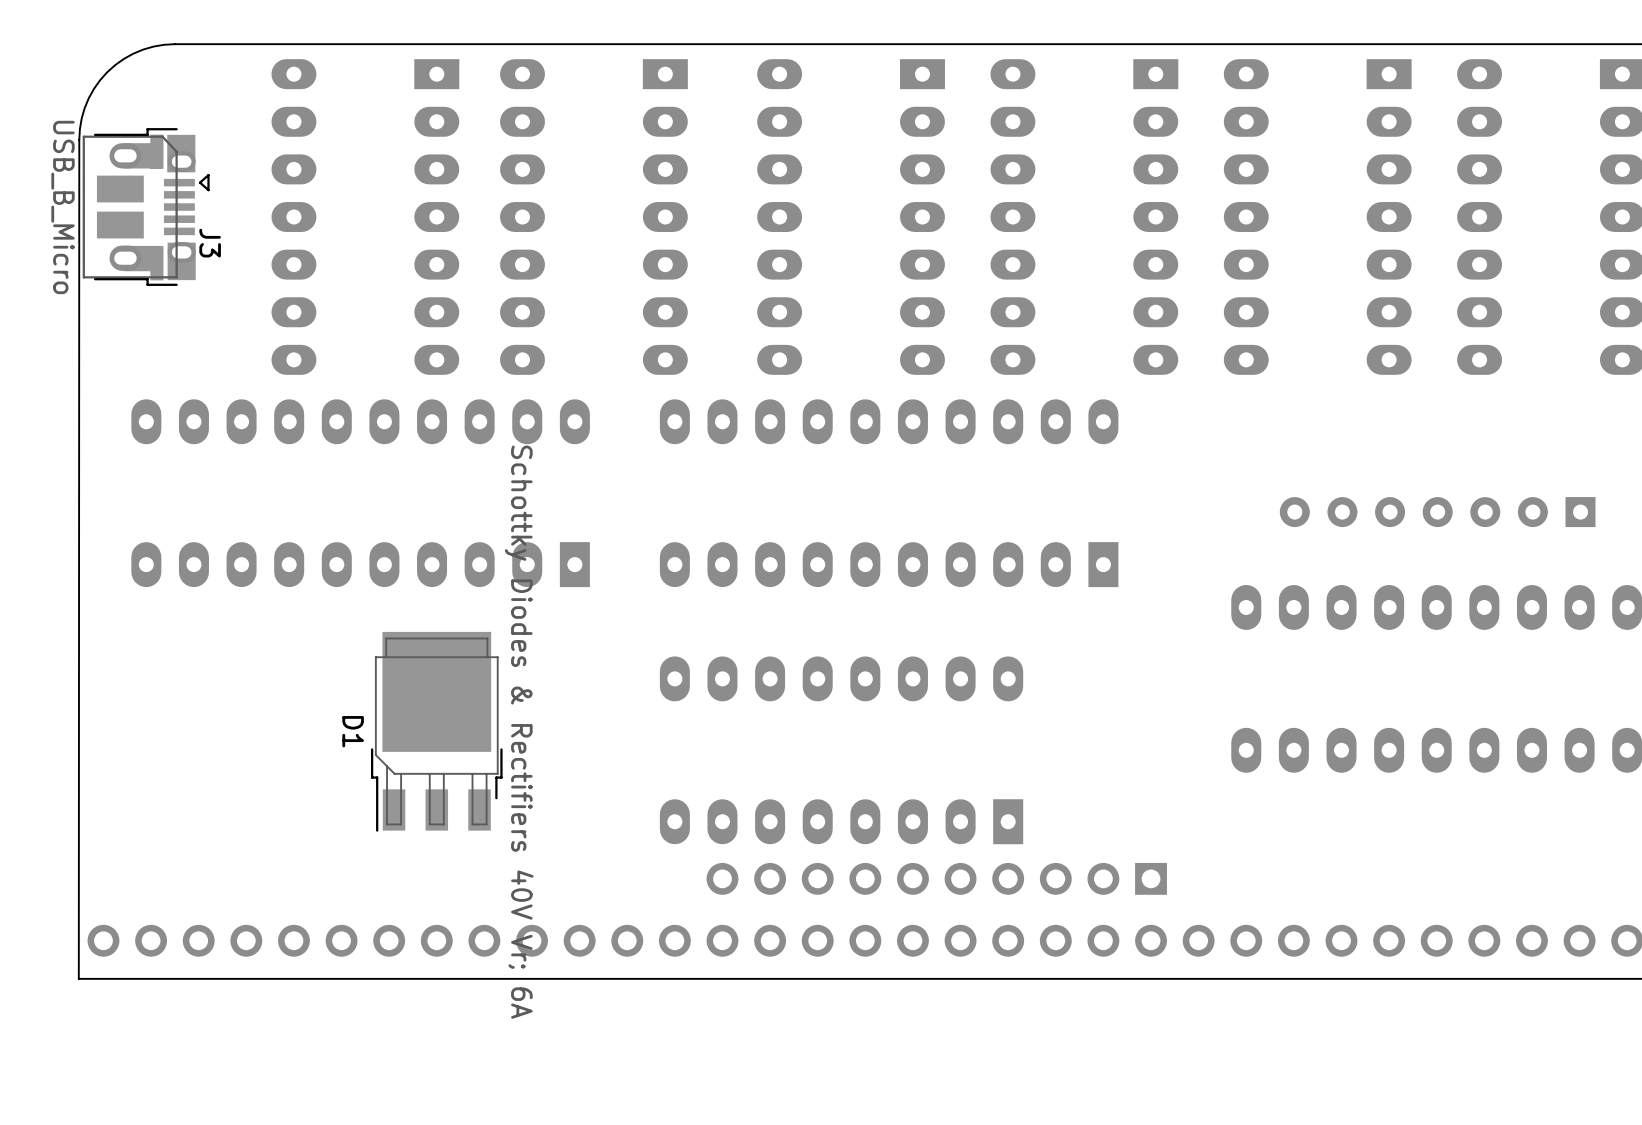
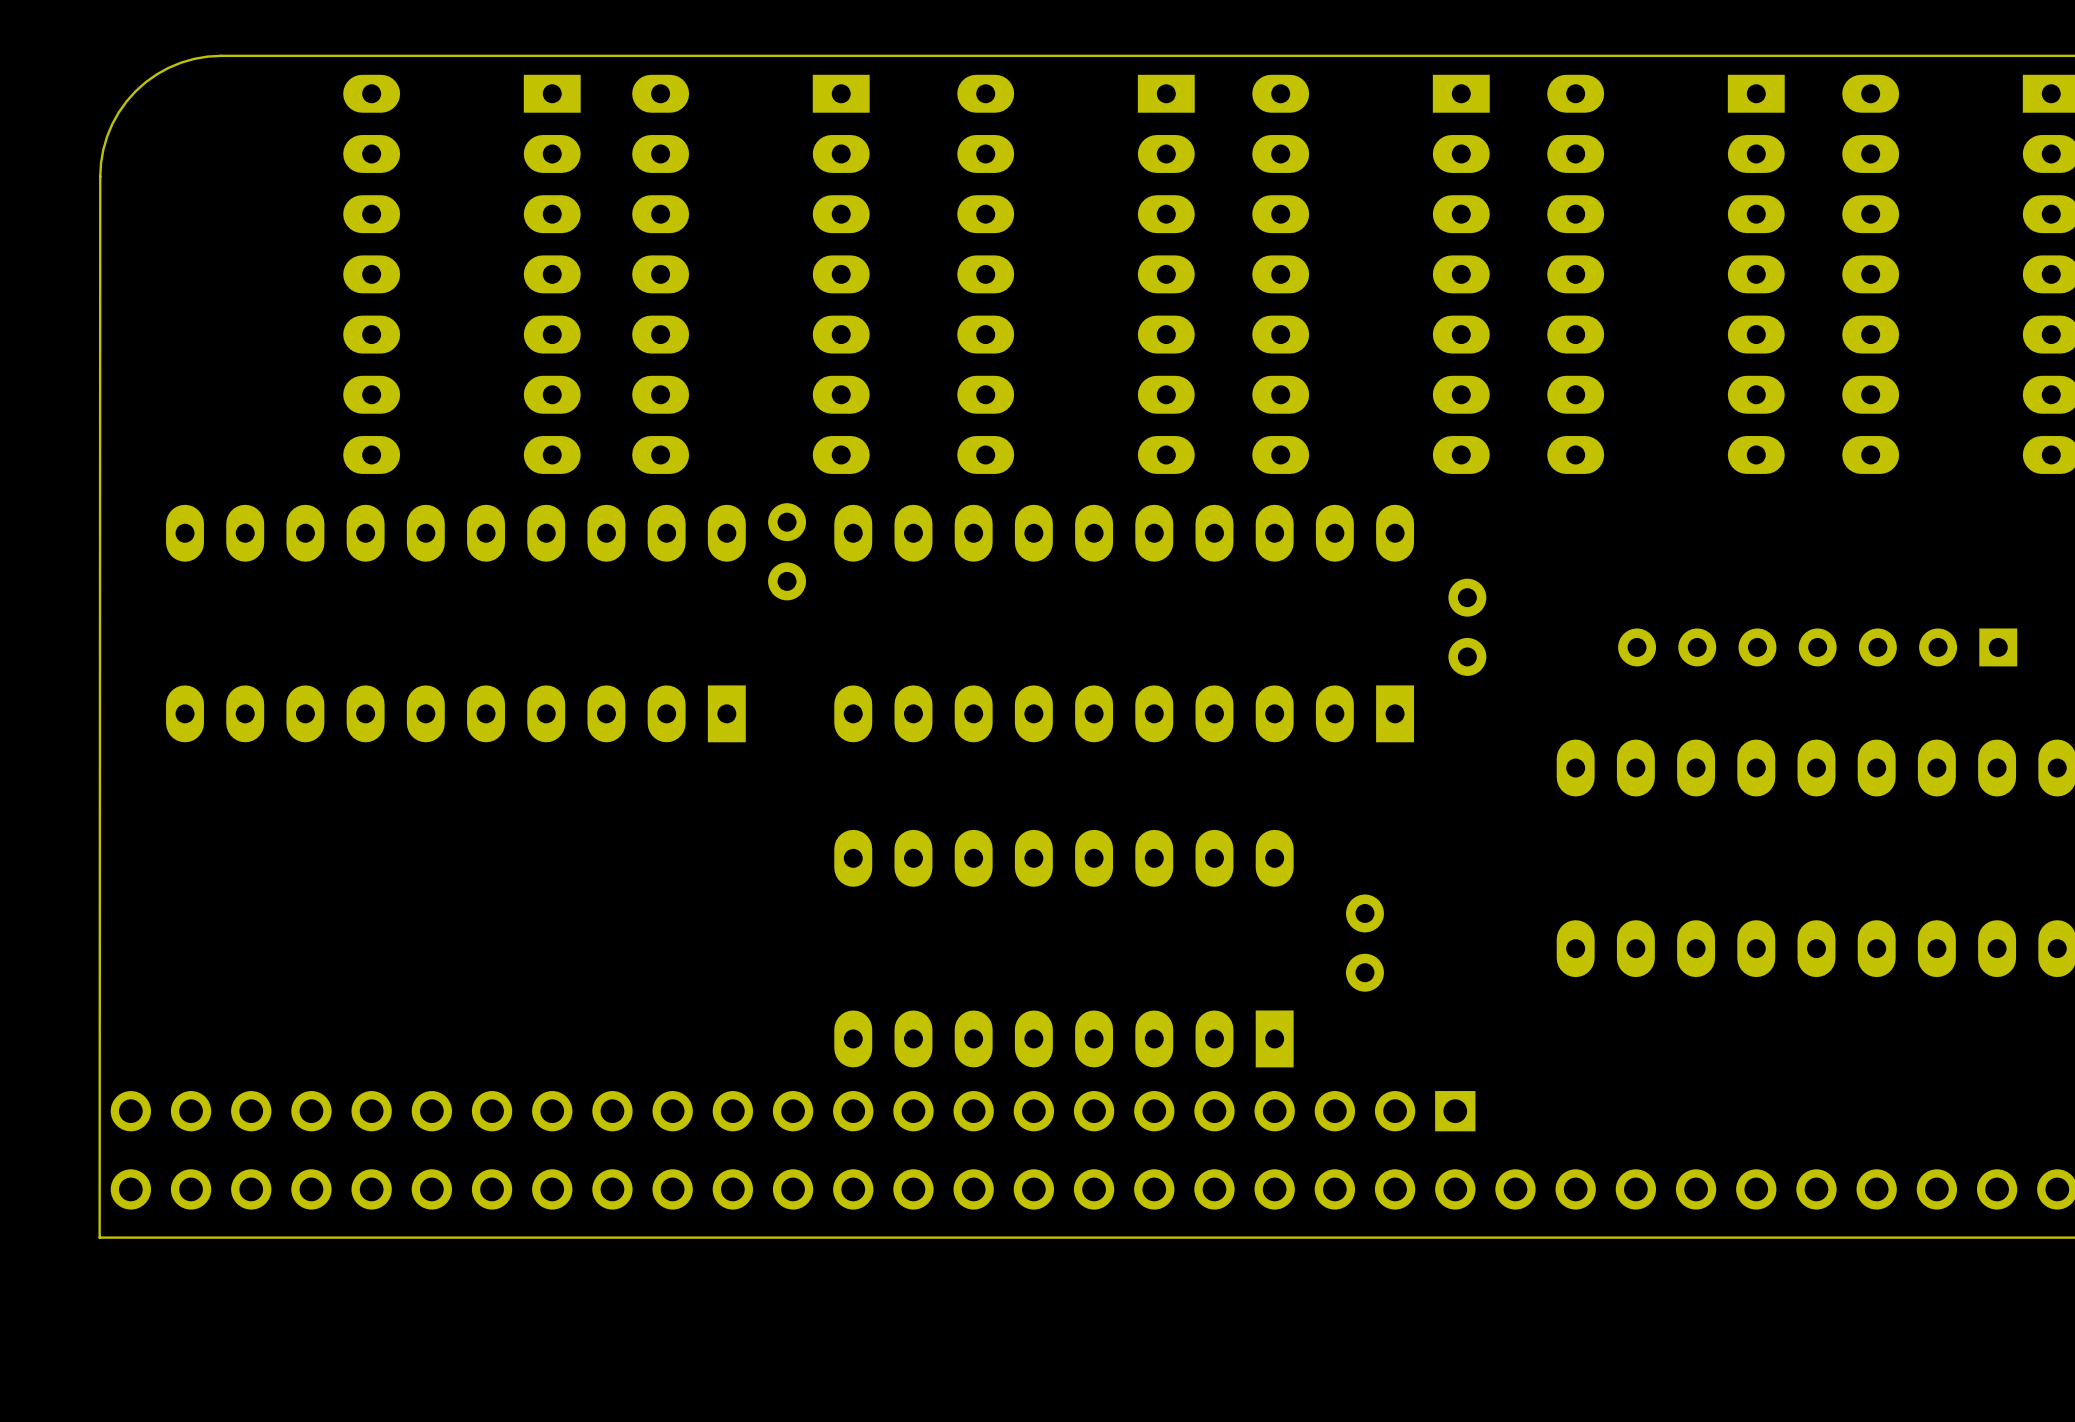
J3: USB_B_Micro (146, 207) -> none
part: none -> (787, 551)
part: none -> (1467, 627)
D1: Schottky Diodes & Rectifiers 40V Vr; 6A (436, 731) -> none
part: none -> (1364, 943)
part: none -> (793, 1111)

